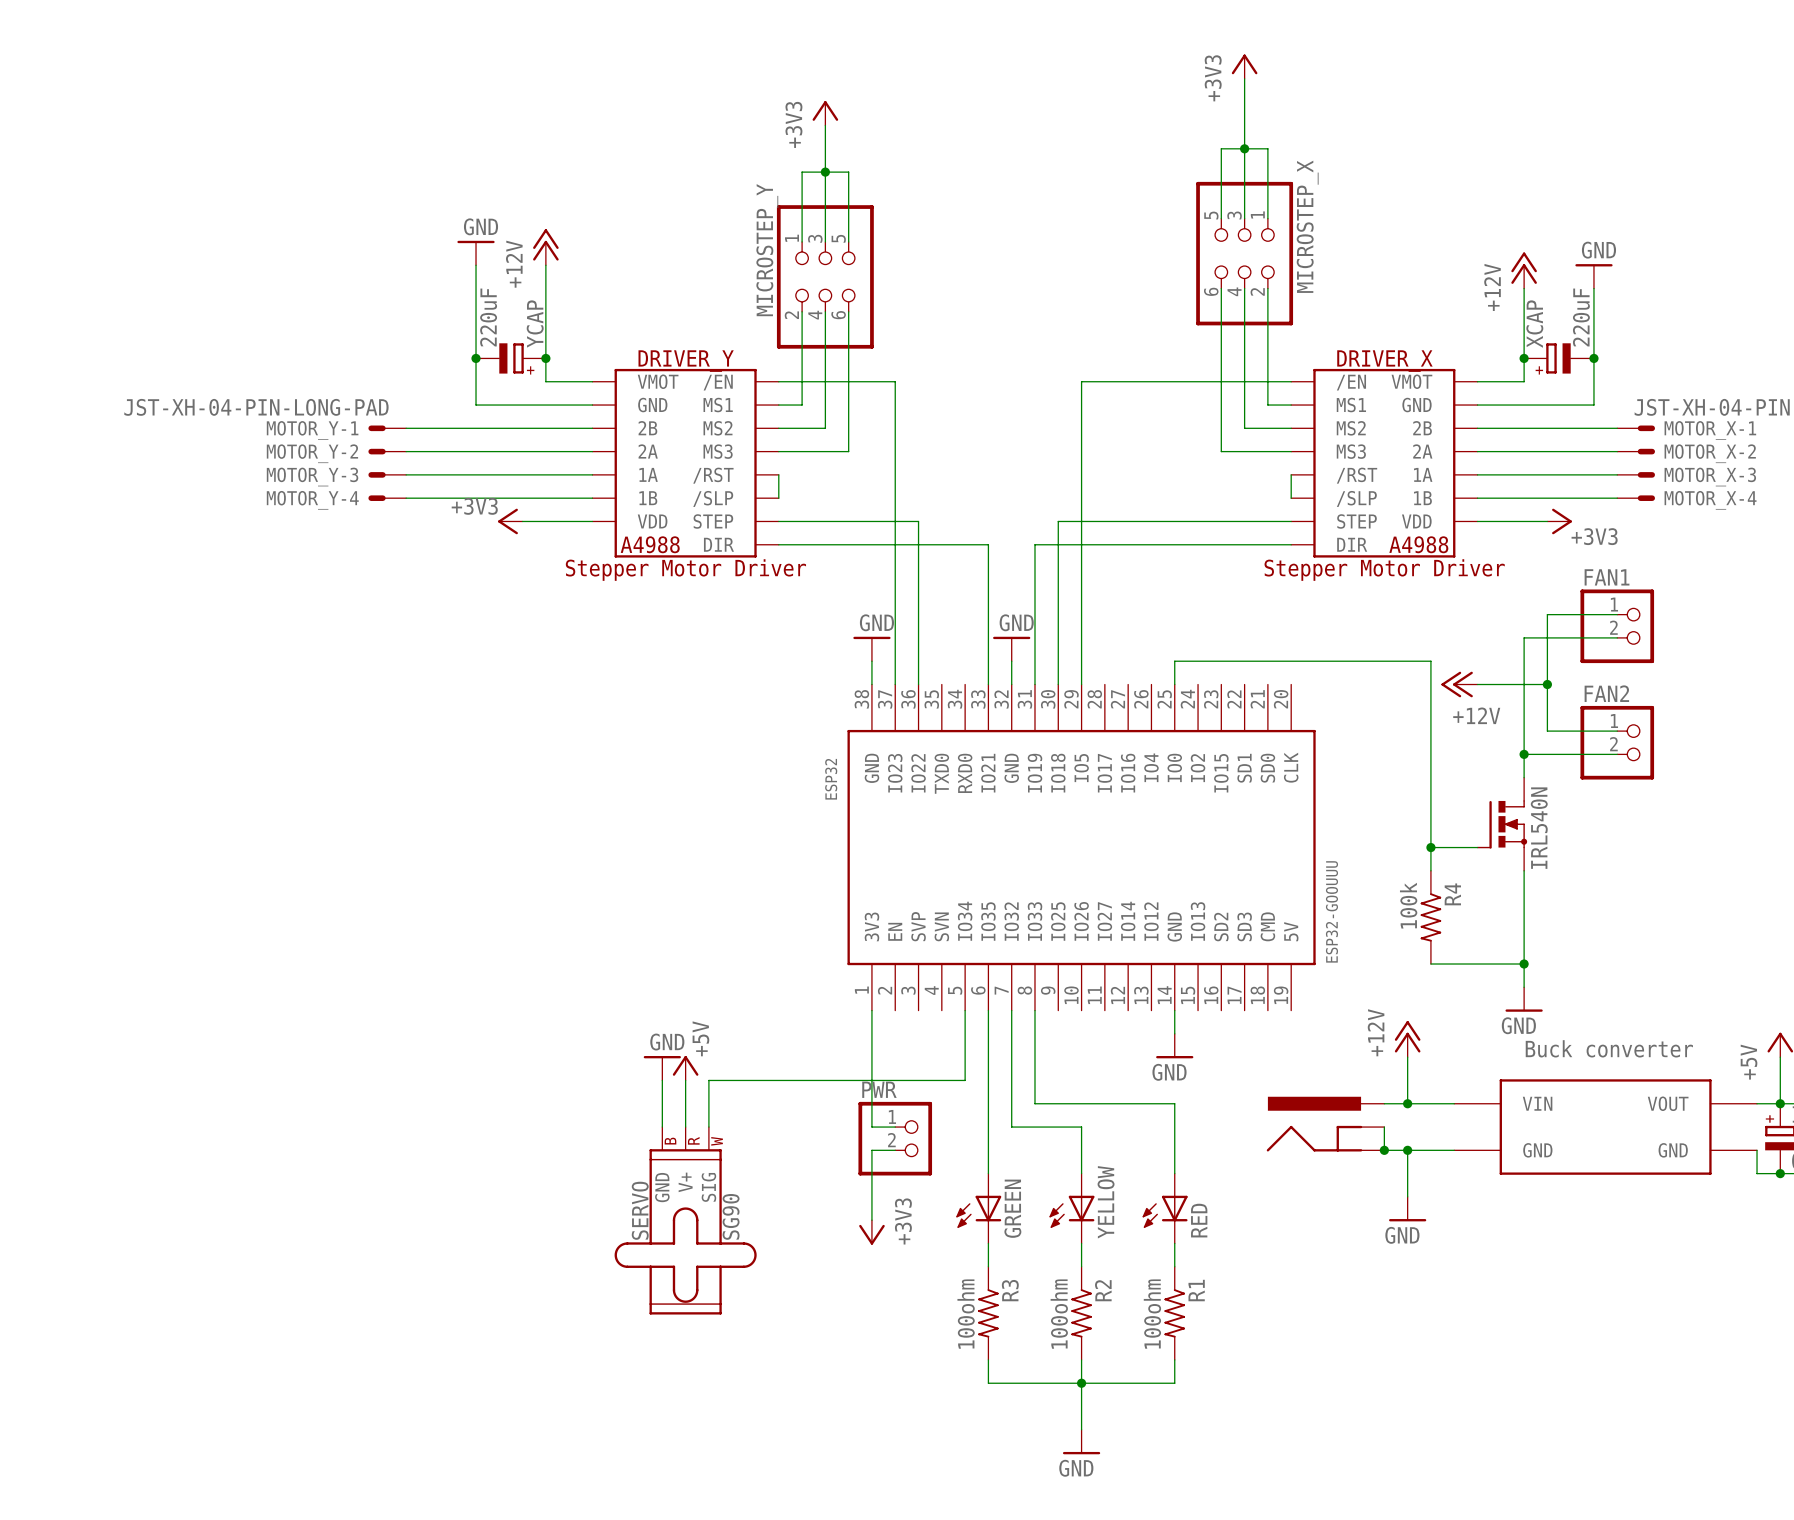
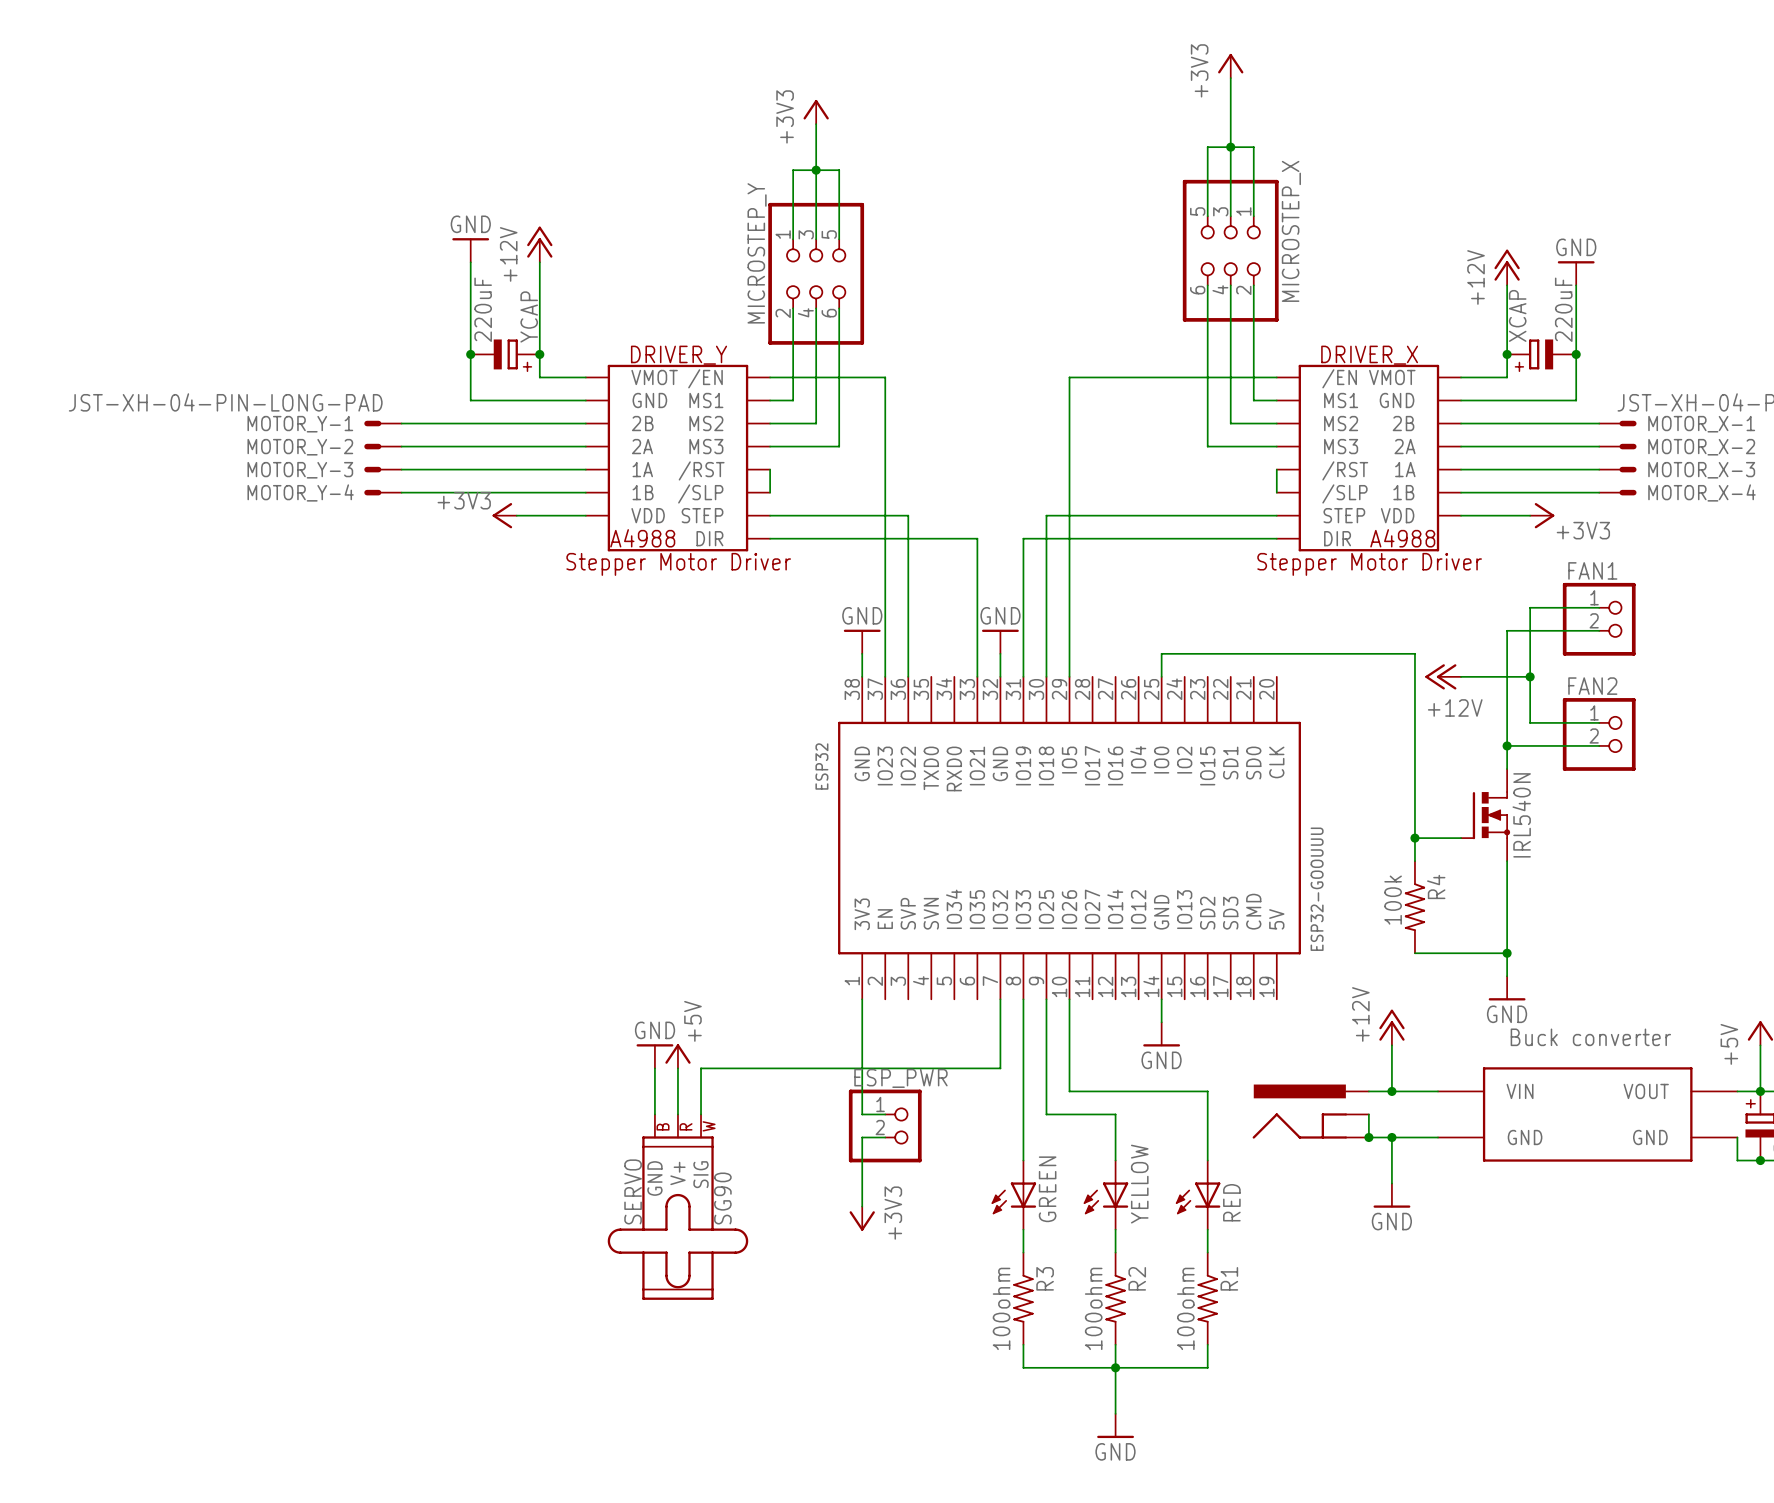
wire: (965, 1010) (965, 1080) -> (1000, 1068) (954, 1068)
wire: (988, 1010) (988, 1173) -> none
wire: none -> (1069, 999) (1069, 1091)
wire: (1011, 1080) (1011, 1127) (1058, 1127) -> (1046, 999) (1046, 1114)
PWR name: PWR (879, 1089) -> ESP_PWR (900, 1078)
wire: (1034, 1103) (1081, 1103) -> (1023, 1091) (1023, 1160)
wire: (1174, 1103) (1174, 1173) -> (1161, 1091) (1207, 1091) (1207, 1160)
wire: (1081, 1127) (1081, 1173) -> (1069, 1114) (1115, 1114) (1115, 1160)
GREEN position: (978, 1208) -> (1013, 1195)
YELLOW position: (1071, 1208) -> (1106, 1195)
RED position: (1165, 1208) -> (1198, 1195)
wire: (988, 1243) (988, 1266) -> (1023, 1229) (1023, 1252)
wire: (1081, 1243) (1081, 1266) -> (1115, 1229) (1115, 1252)
wire: (1174, 1243) (1174, 1266) -> (1207, 1229) (1207, 1252)
R3 position: (988, 1313) -> (1023, 1298)
R2 position: (1081, 1313) -> (1115, 1298)
R1 position: (1174, 1313) -> (1207, 1298)
wire: (988, 1359) (988, 1383) (1034, 1383) -> (1023, 1344) (1023, 1367)
wire: (1081, 1359) (1081, 1429) -> (1115, 1344) (1115, 1413)
wire: (1174, 1359) (1174, 1383) -> (1207, 1344) (1207, 1367) (1161, 1367)
junction position: (1081, 1383) -> (1115, 1367)
power symbol position: GND (1081, 1442) -> GND (1115, 1425)

